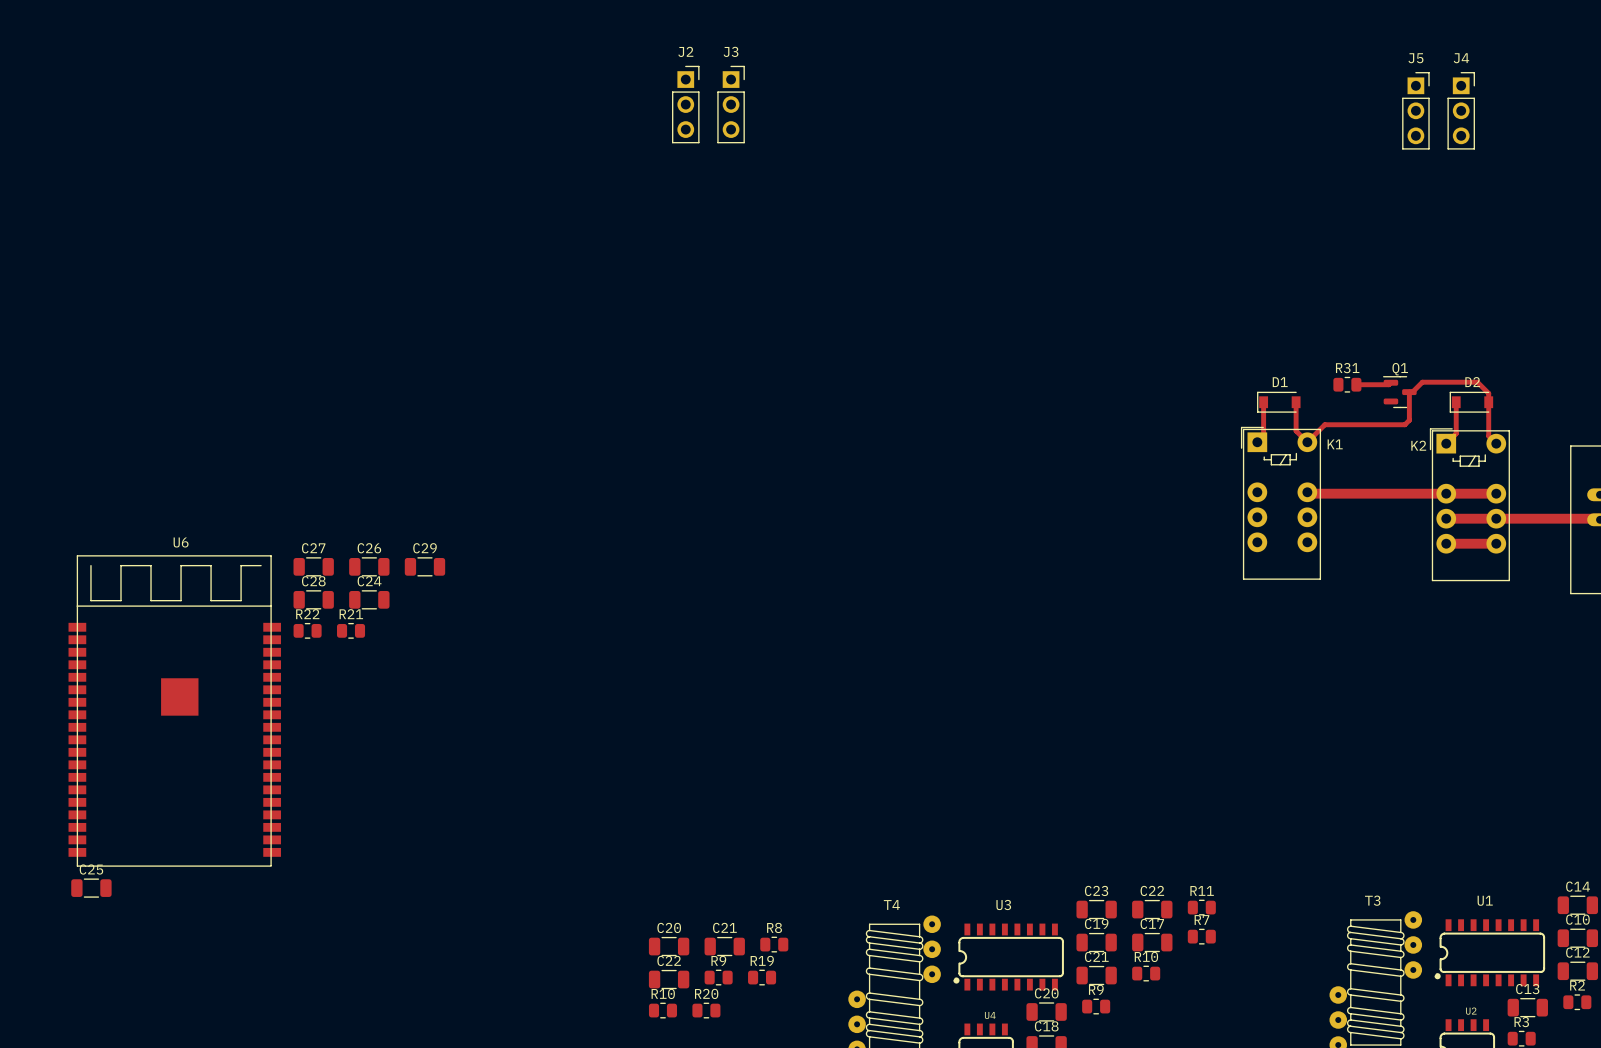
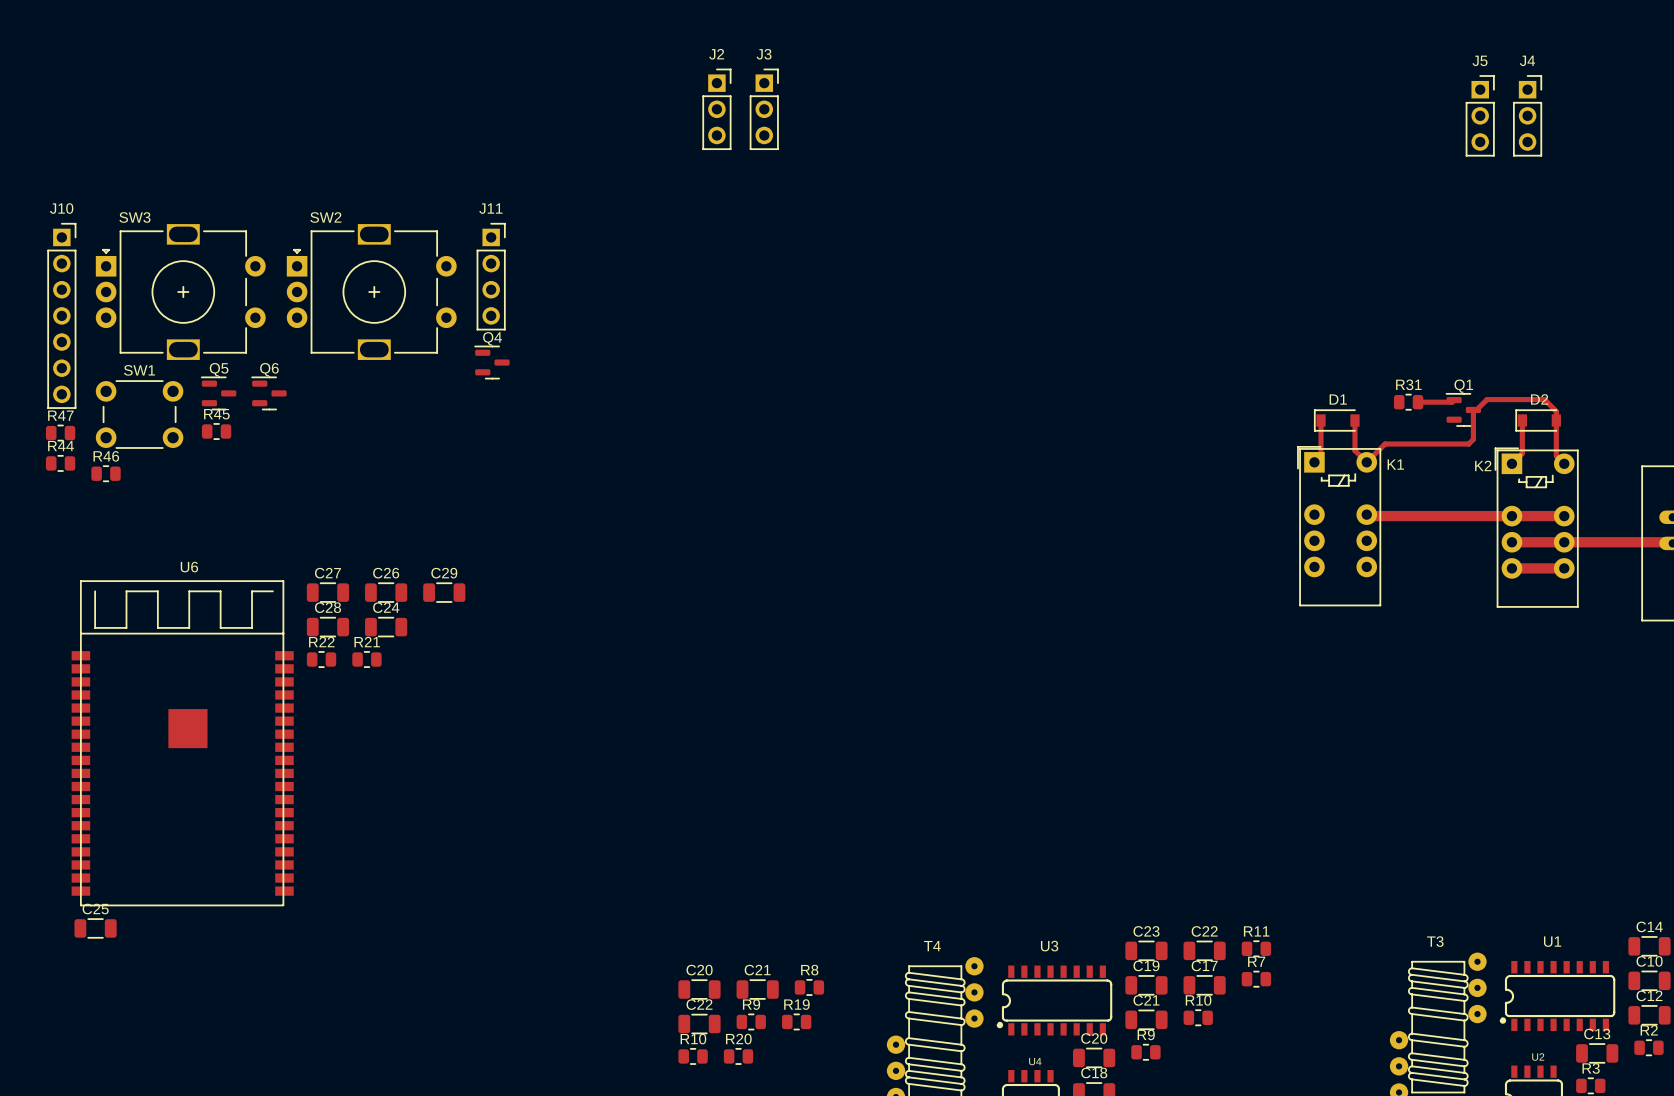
J11: none -> (491, 276)
SW3: none -> (180, 292)
SW2: none -> (371, 292)
J10: none -> (61, 315)
Q4: none -> (492, 362)
Q5: none -> (218, 393)
Q6: none -> (269, 393)
SW1: none -> (139, 414)
R45: none -> (216, 431)
R47: none -> (60, 433)
R44: none -> (60, 463)
R46: none -> (106, 473)

